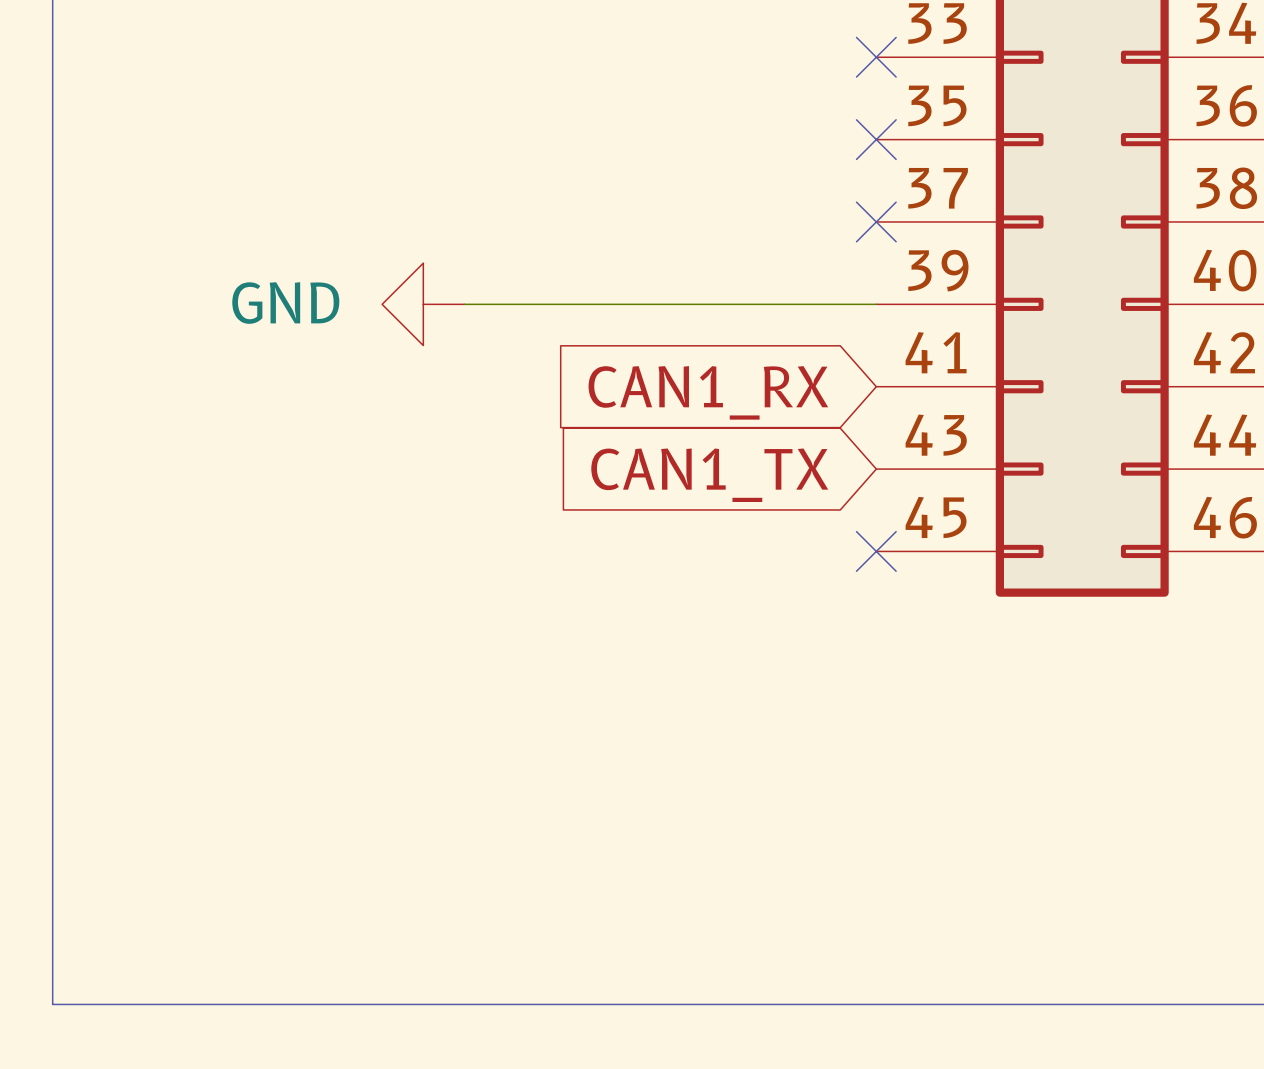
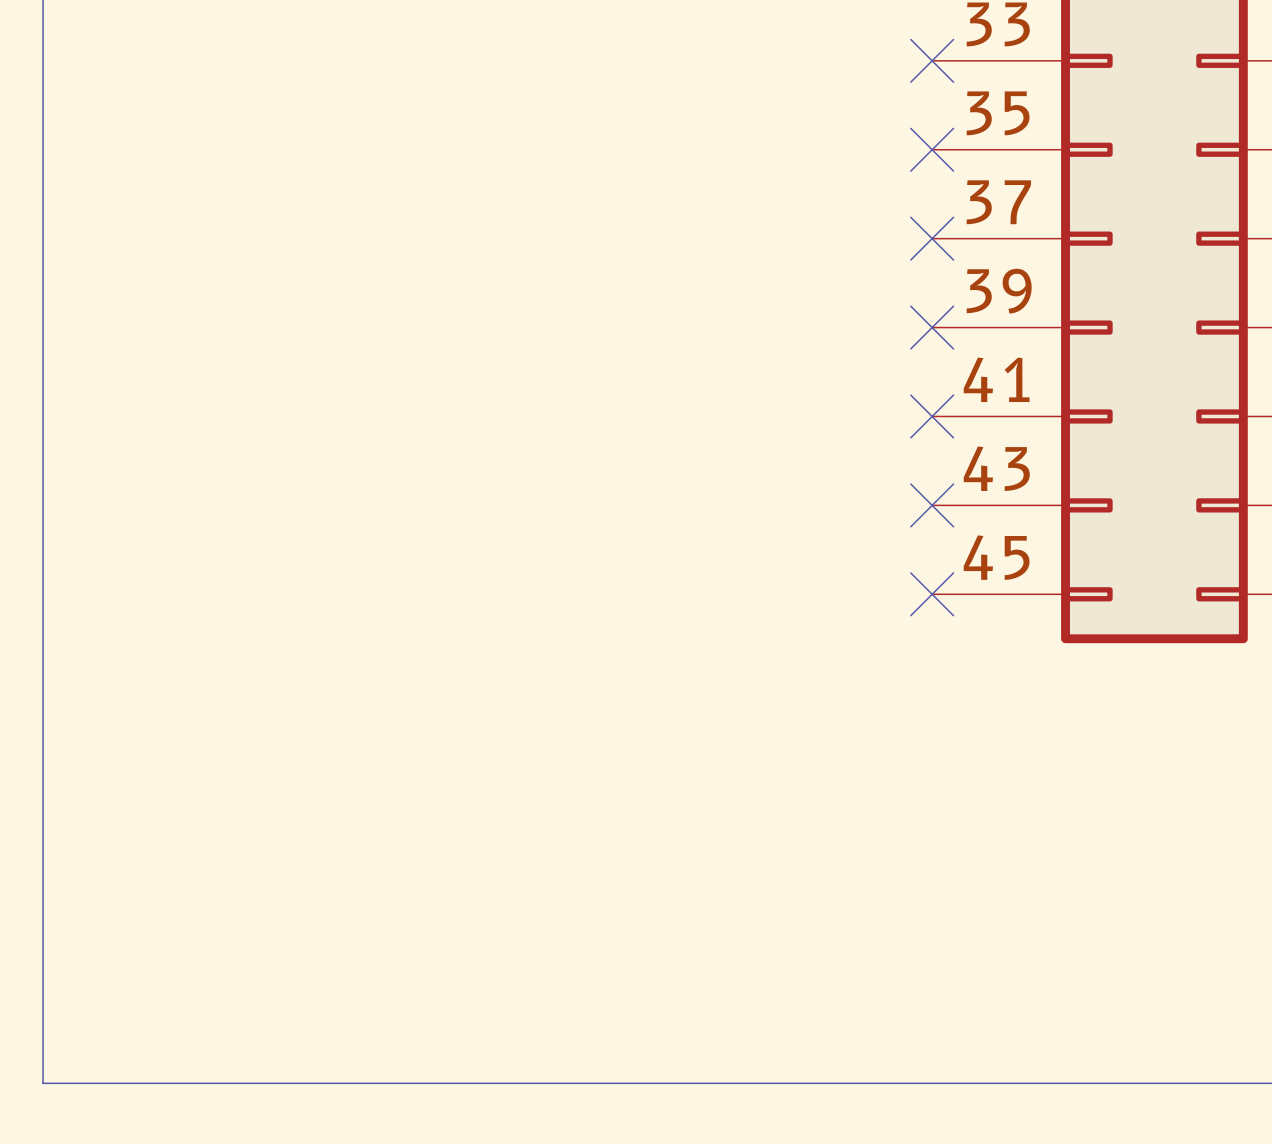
power symbol: GND (423, 304) -> none
wire: (464, 304) (876, 304) -> none
no-connect mark: none -> (932, 327)
no-connect mark: none -> (932, 416)
global label: CAN1_RX (708, 392) -> none
no-connect mark: none -> (932, 505)
global label: CAN1_TX (709, 475) -> none

